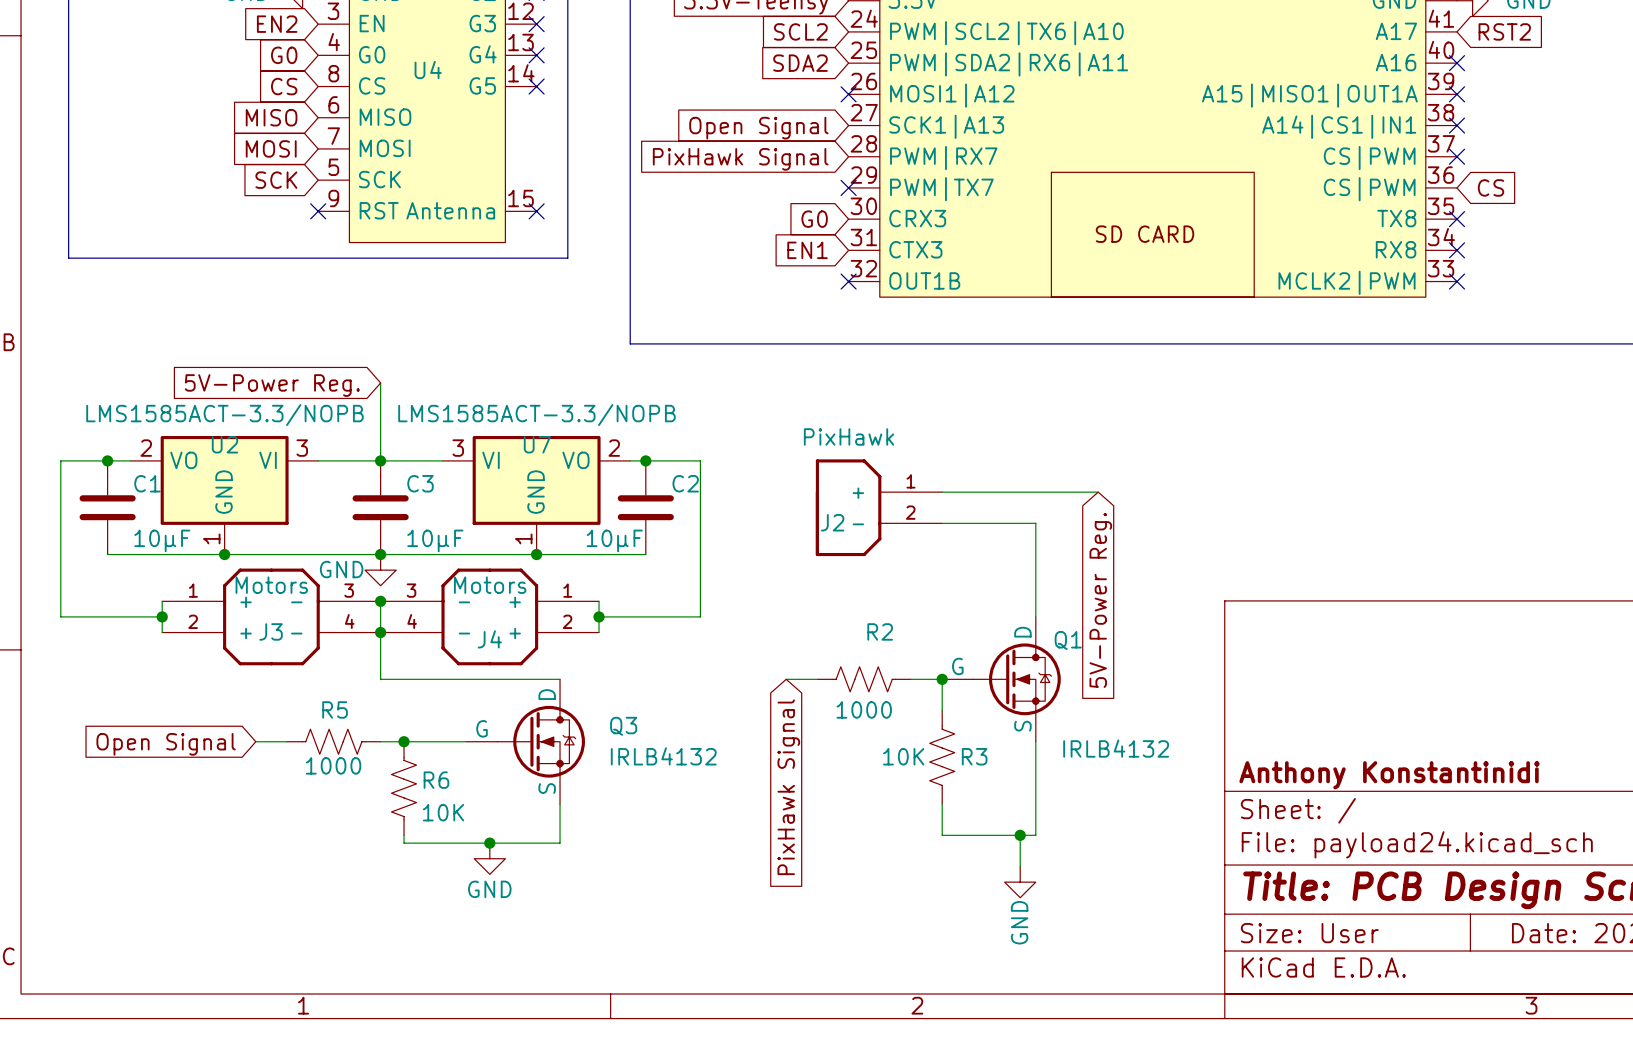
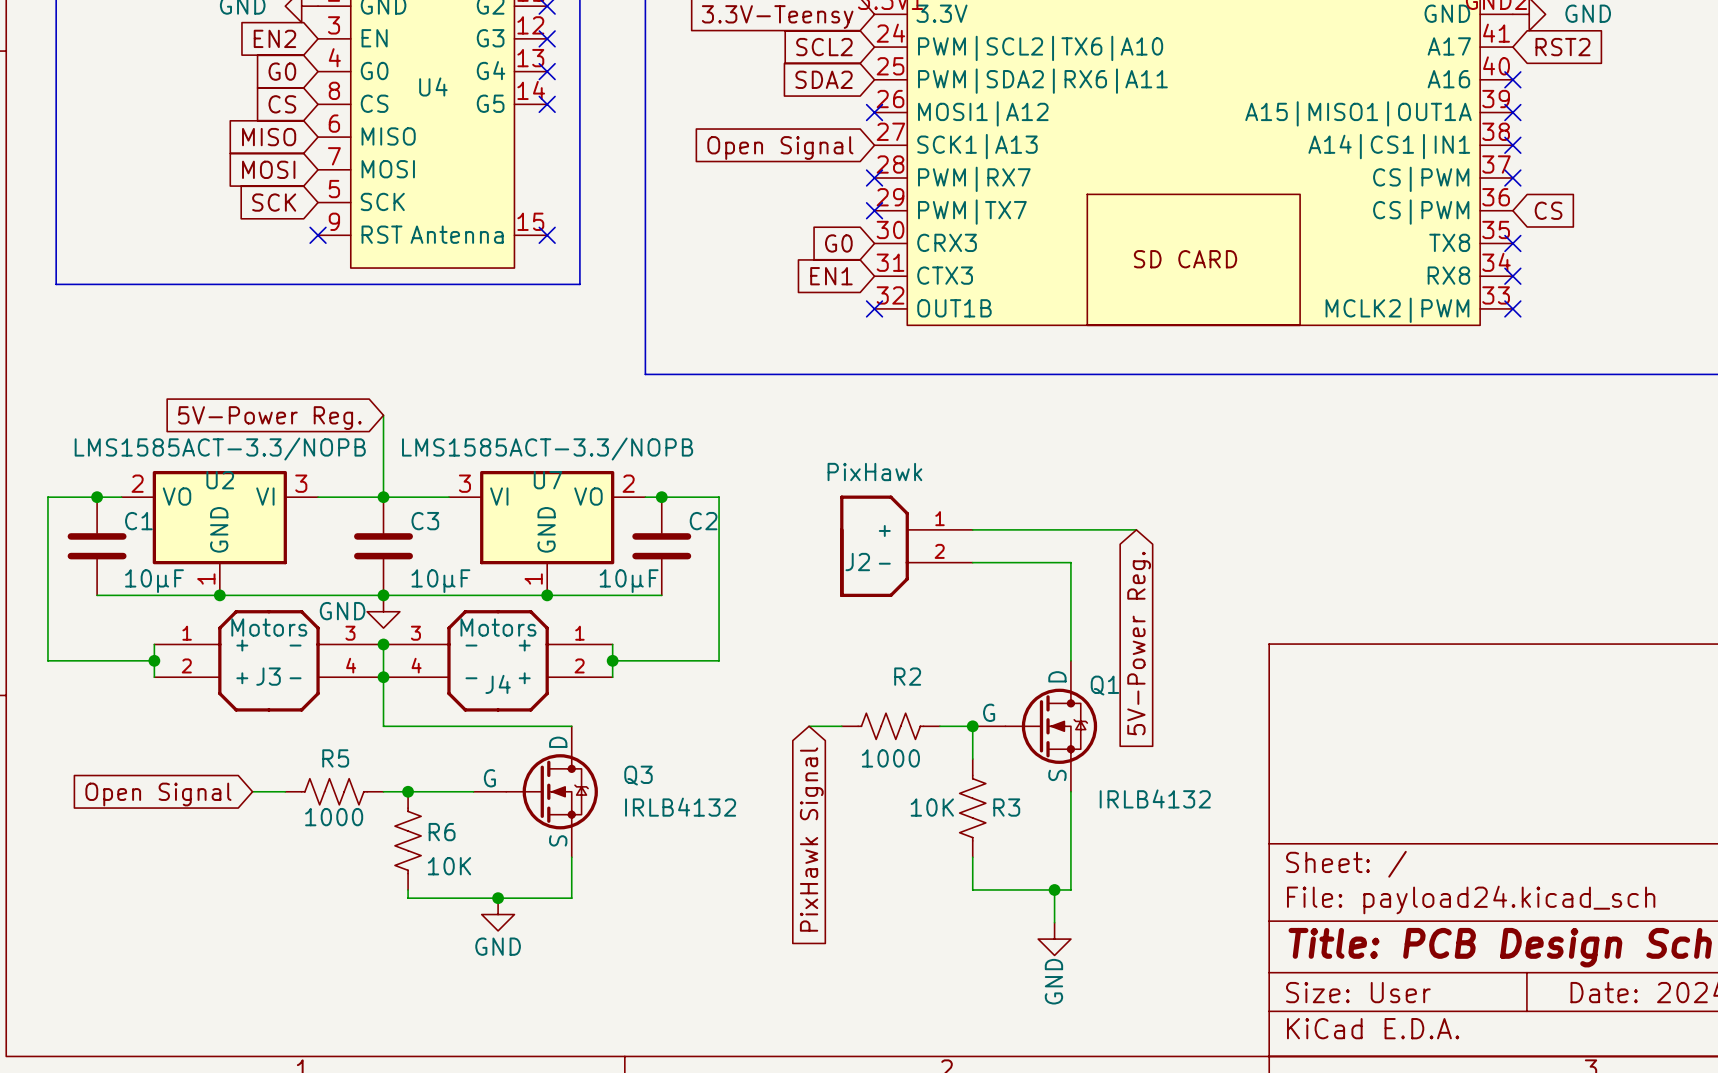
no-connect mark: none -> (874, 178)
global label: PixHawk Signal (740, 159) -> none
title block: Anthony Konstantinidi (1389, 775) -> none

